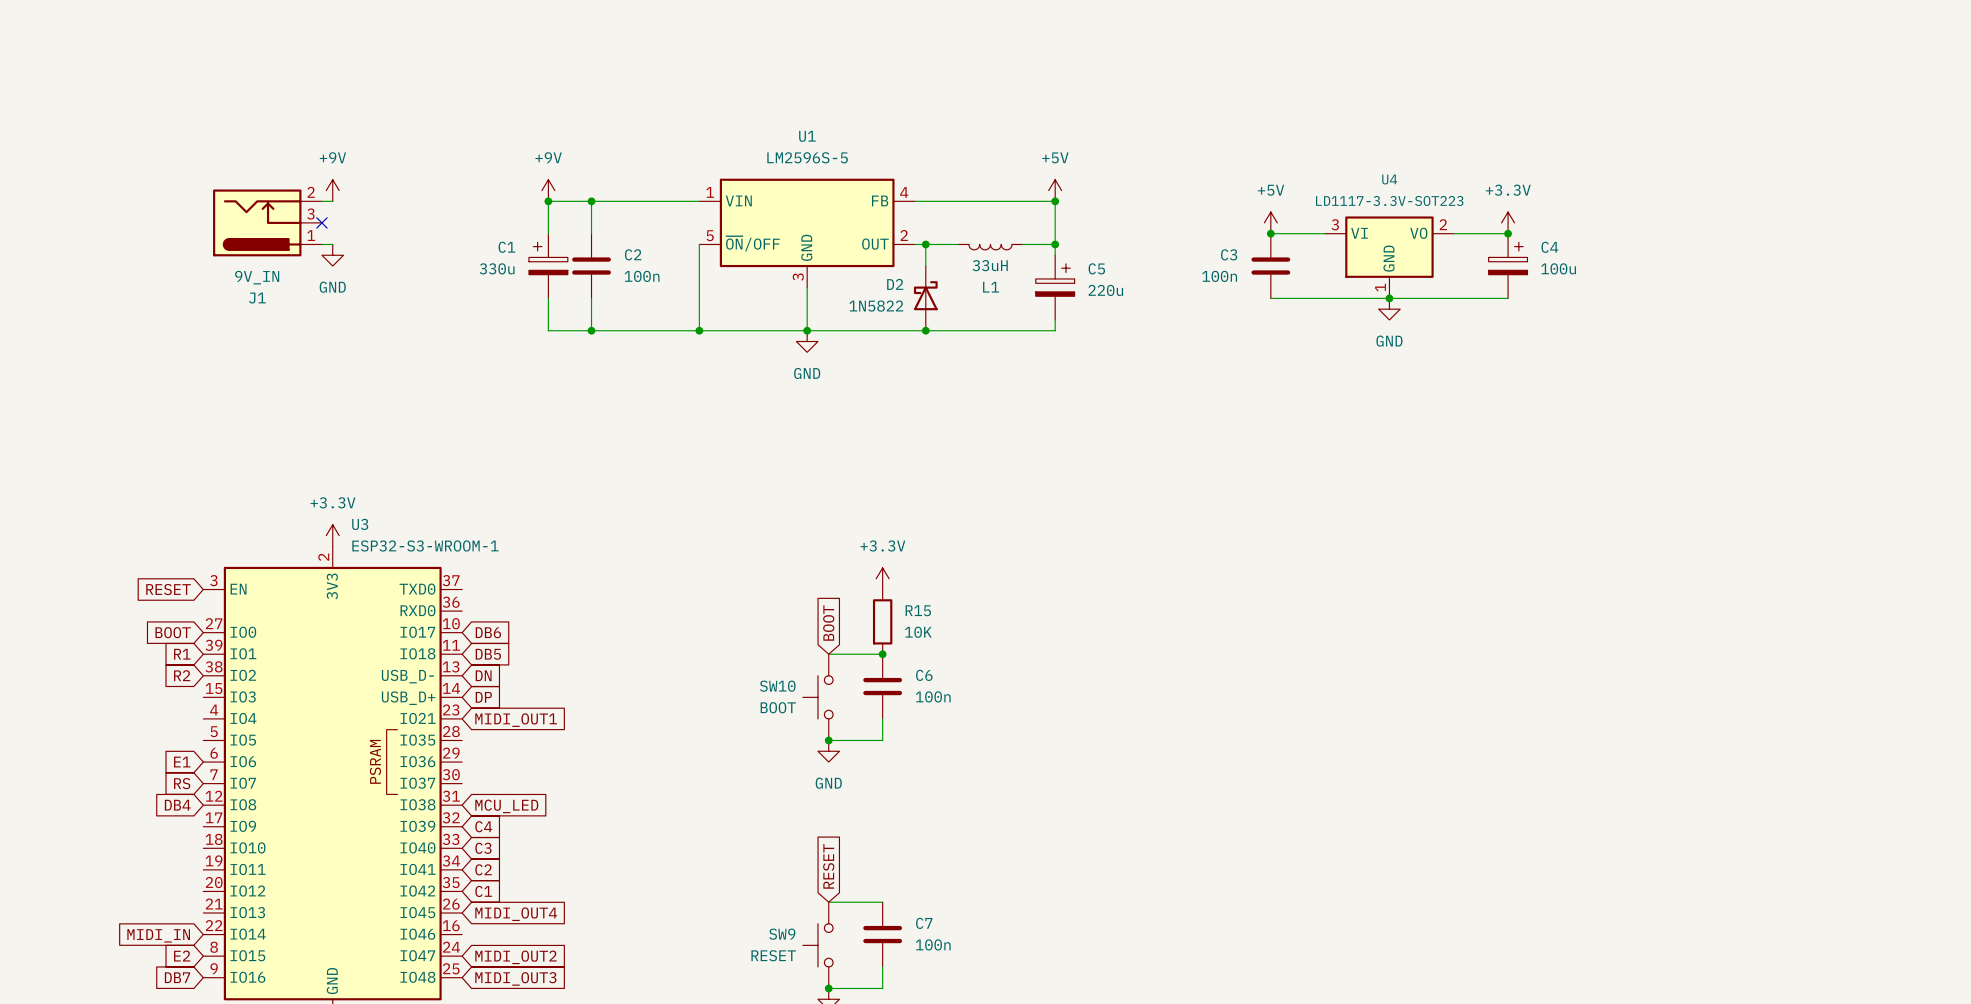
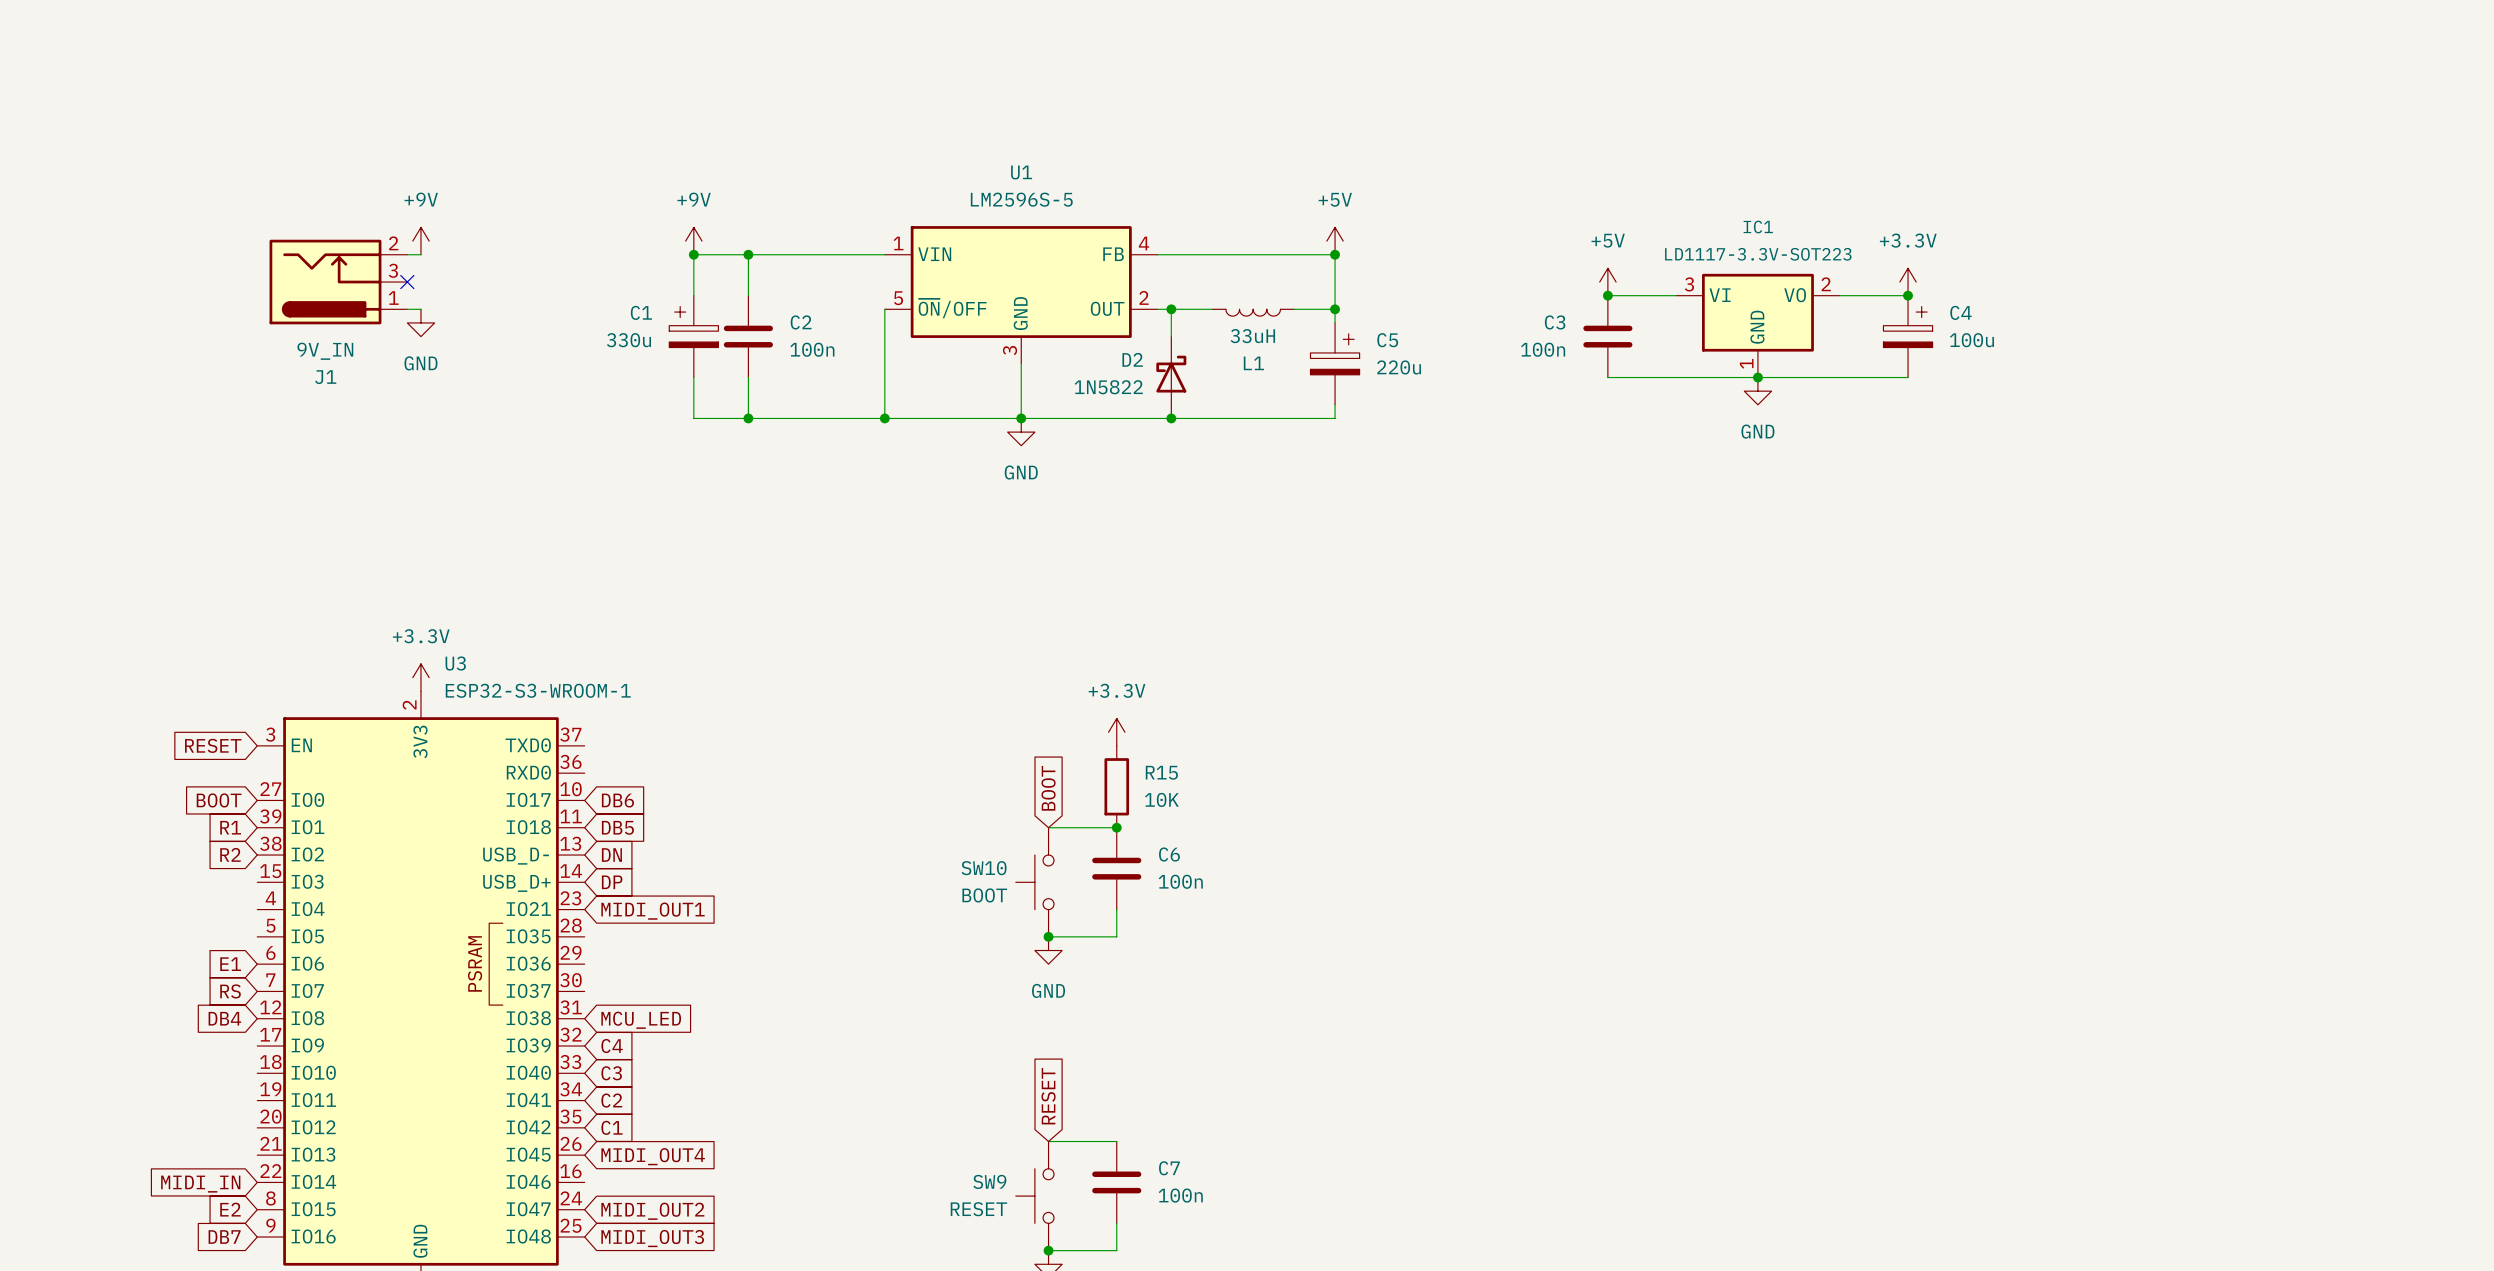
U4 name: U4 (1389, 179) -> IC1 (1758, 227)

